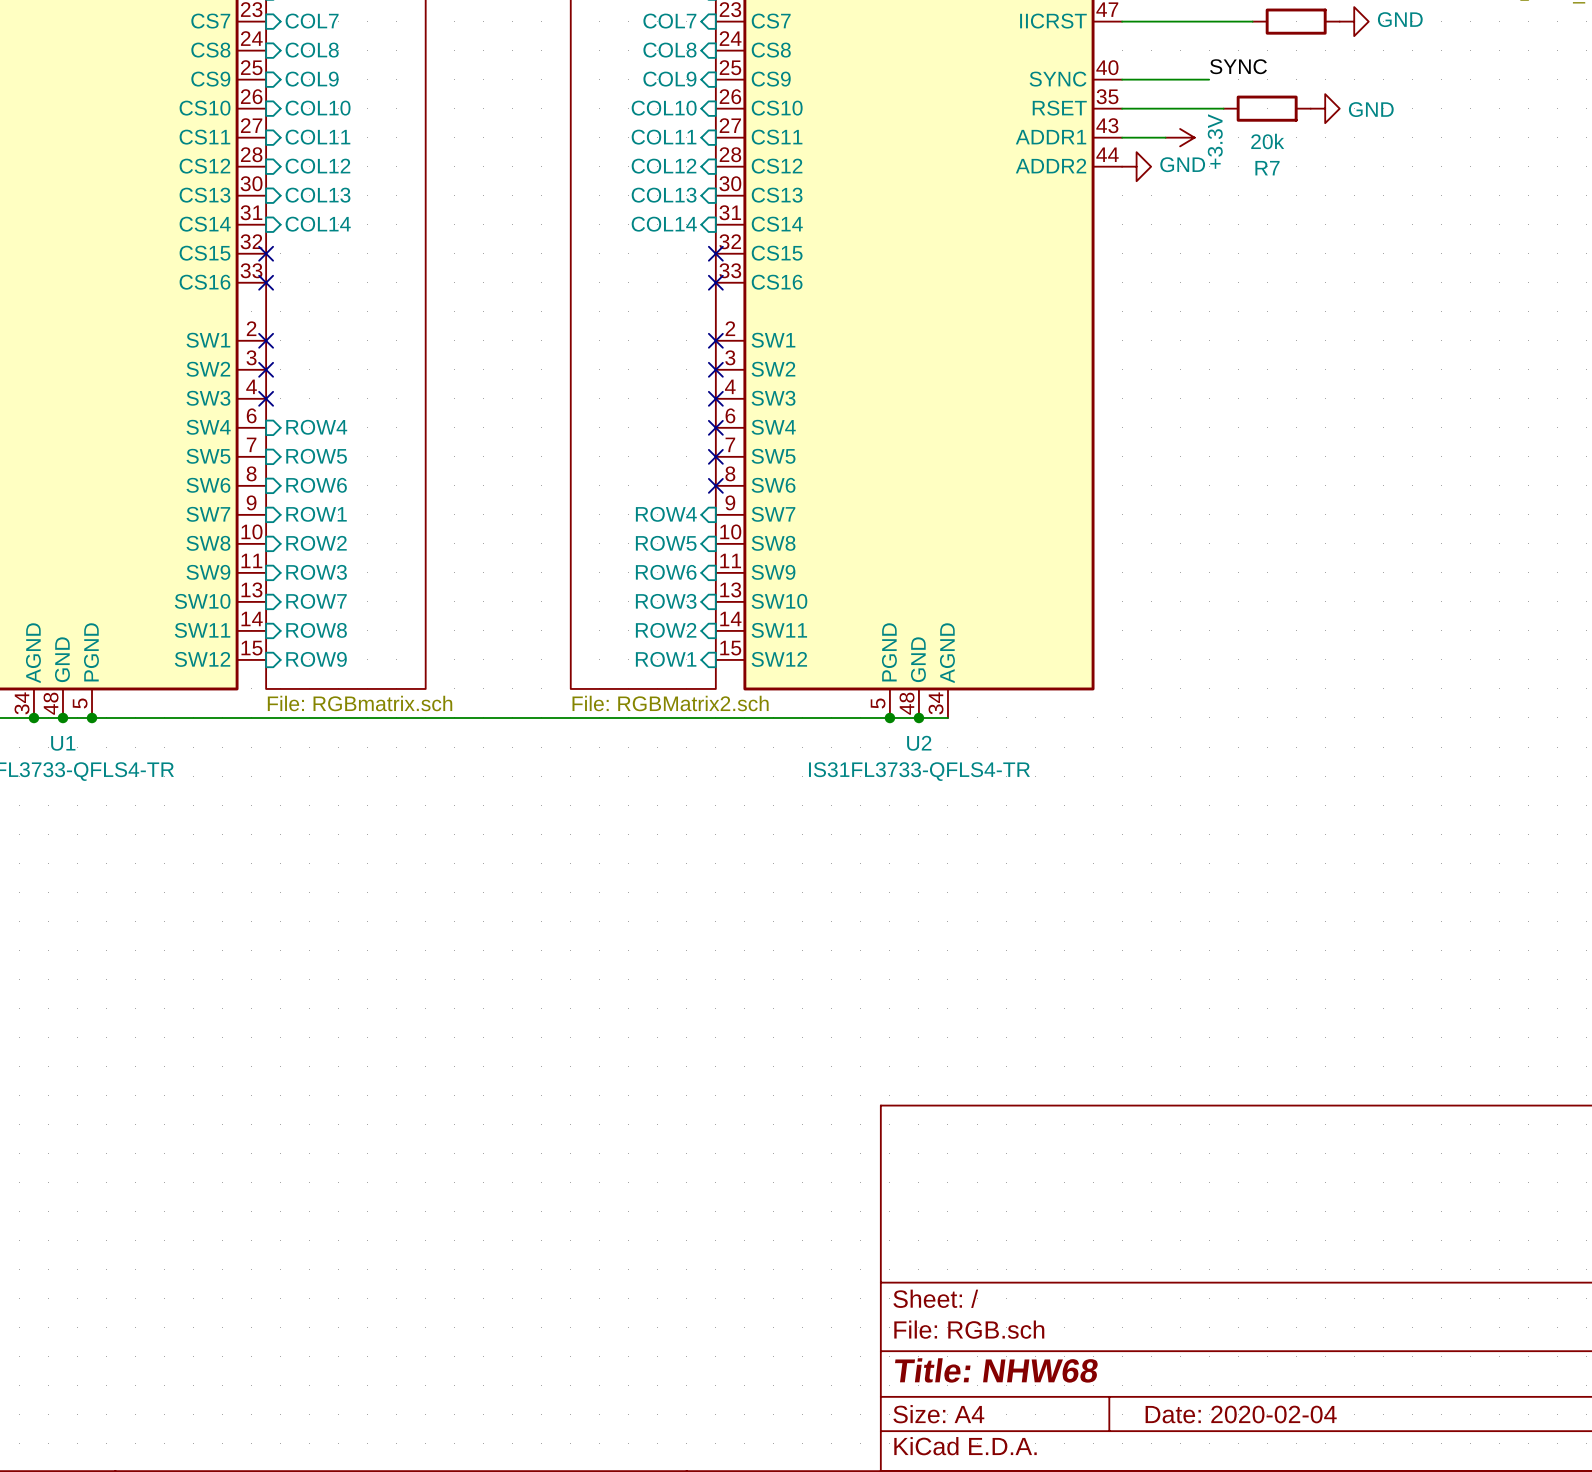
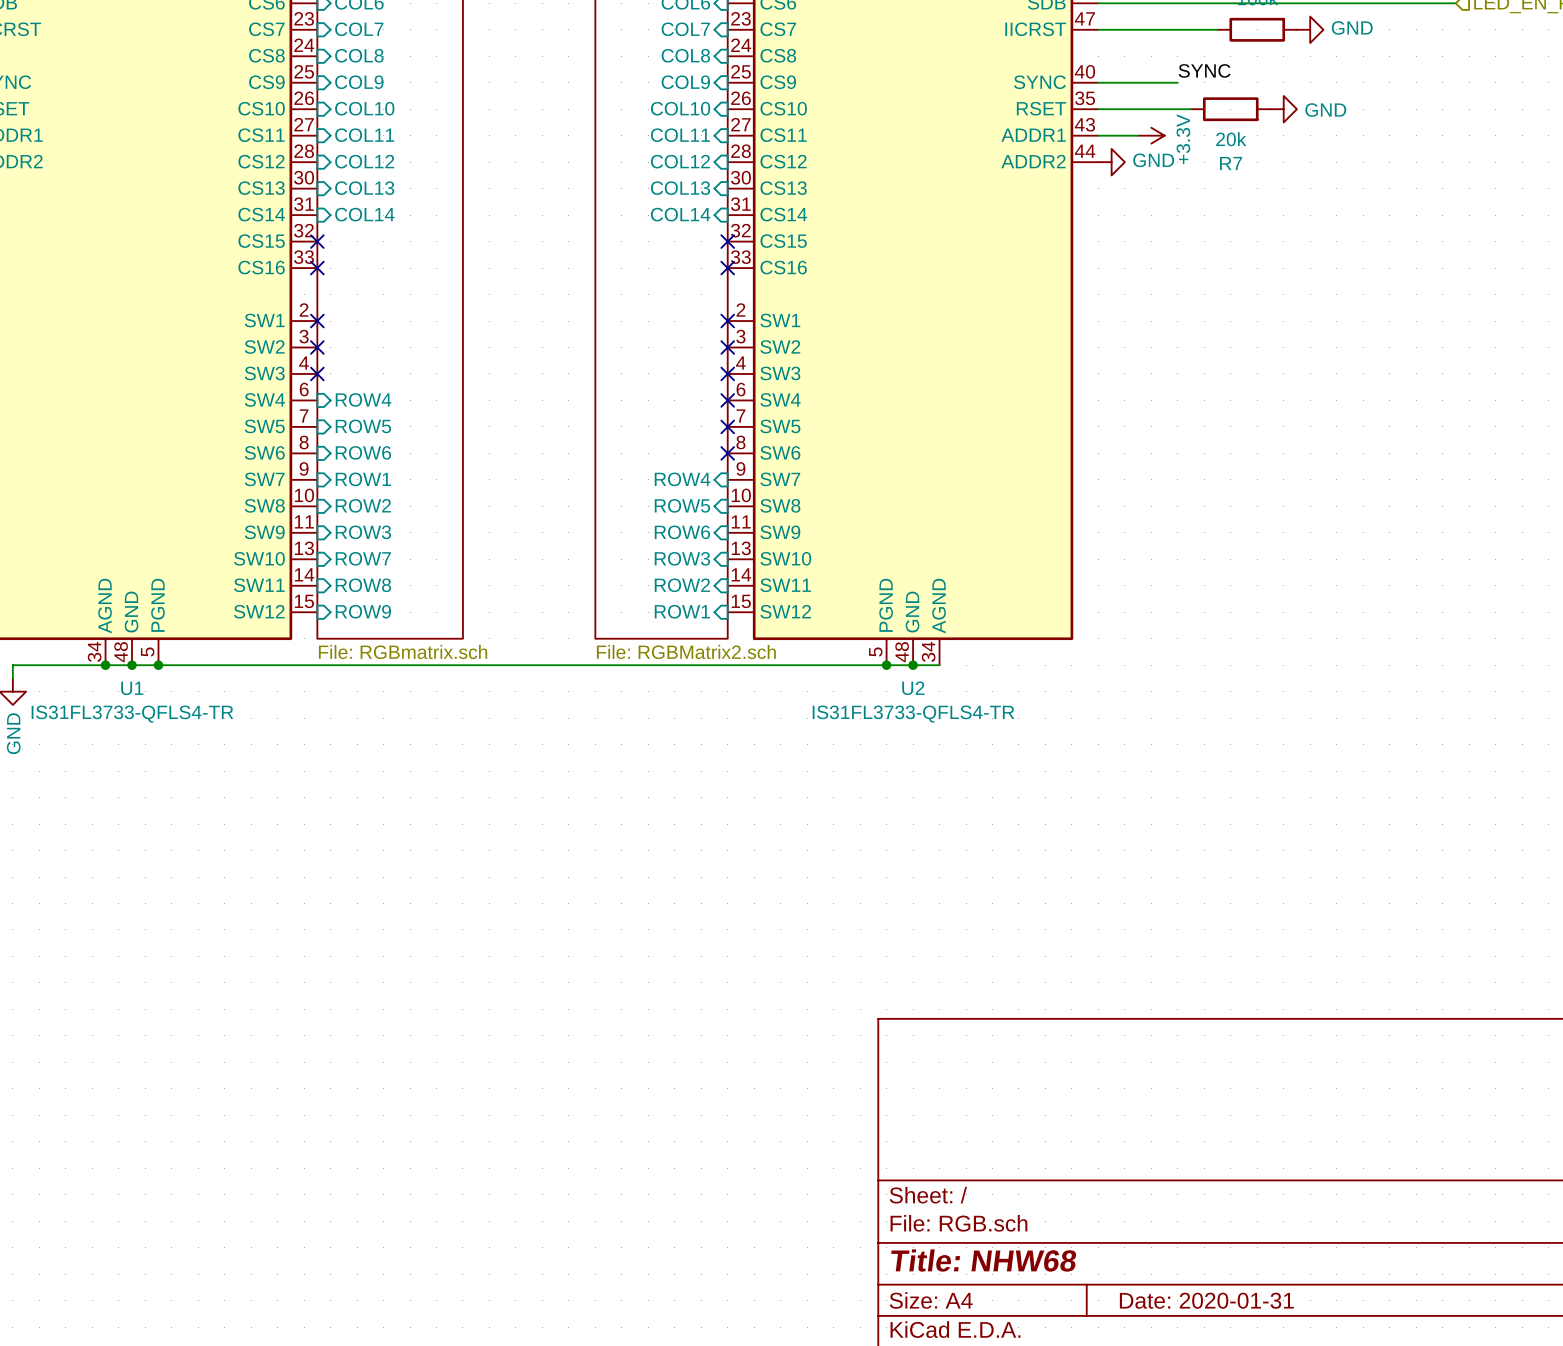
title block: Date: 2020-02-04 (1241, 1414) -> Date: 2020-01-31 (1206, 1300)

